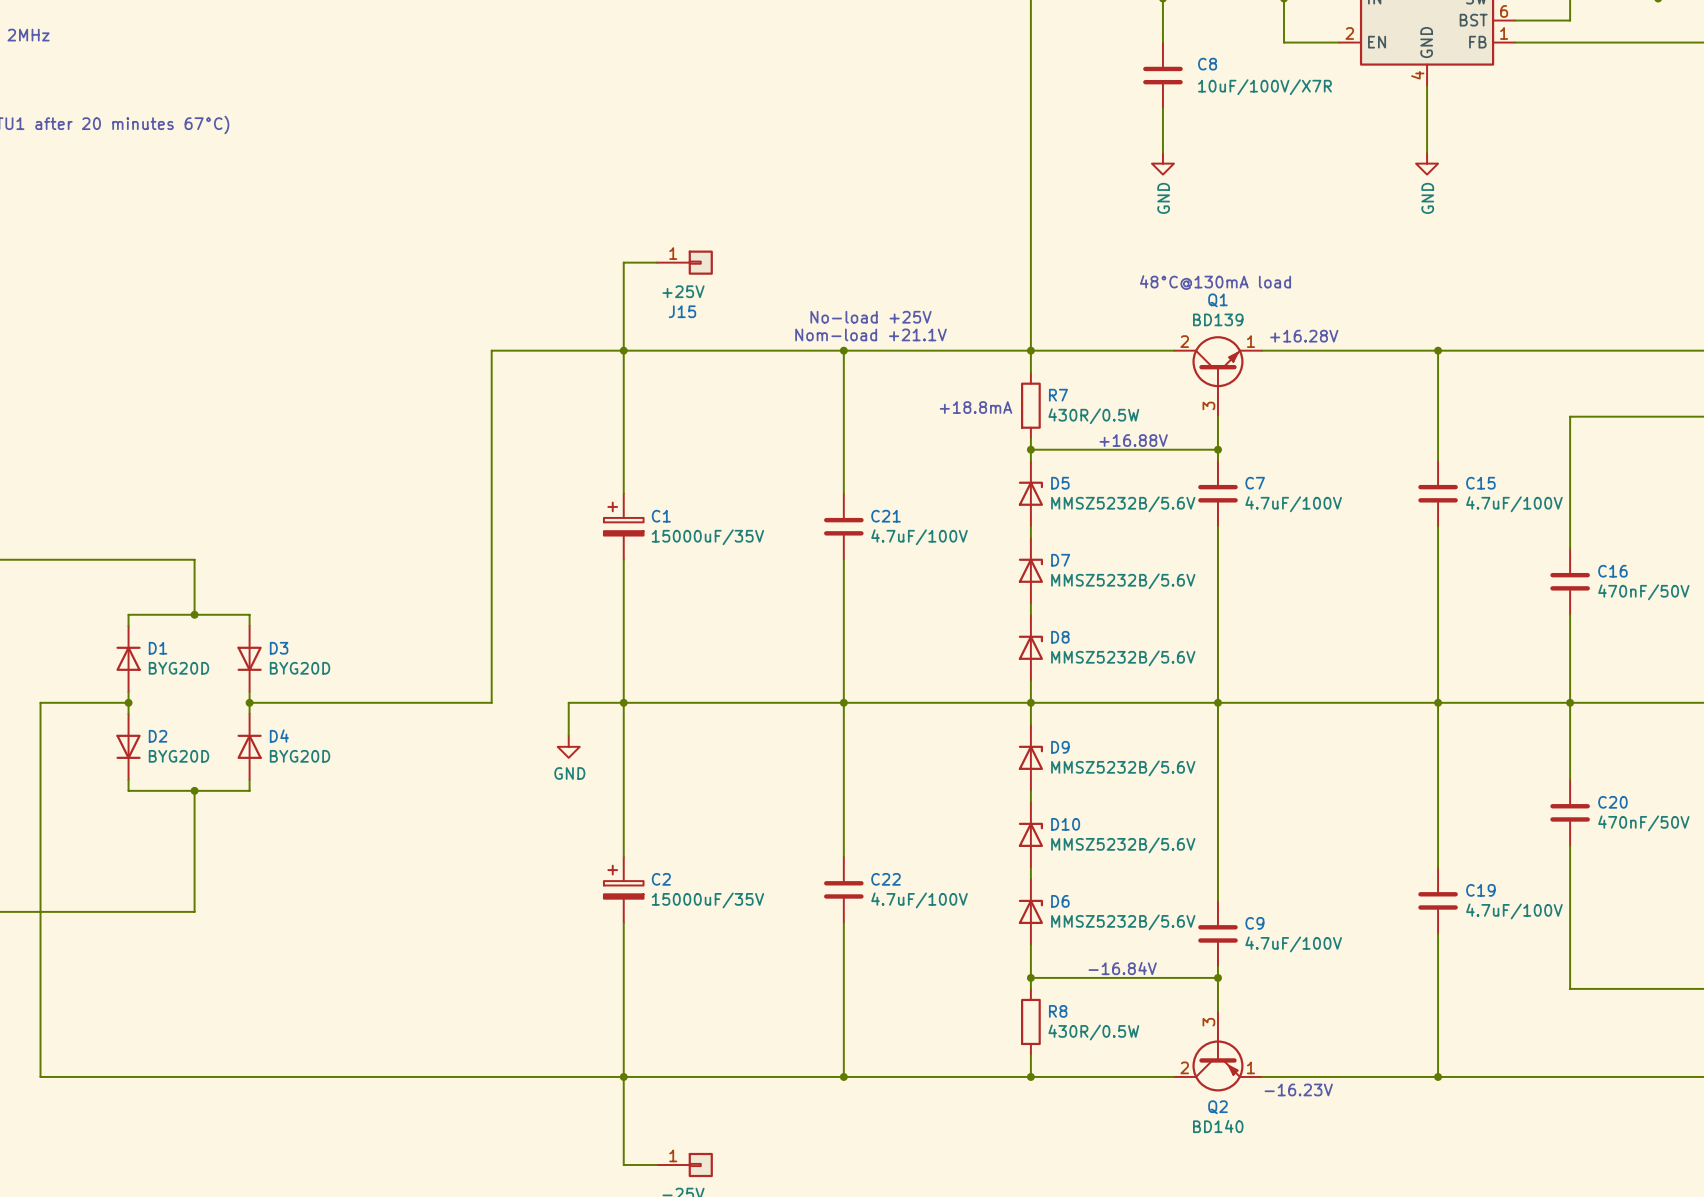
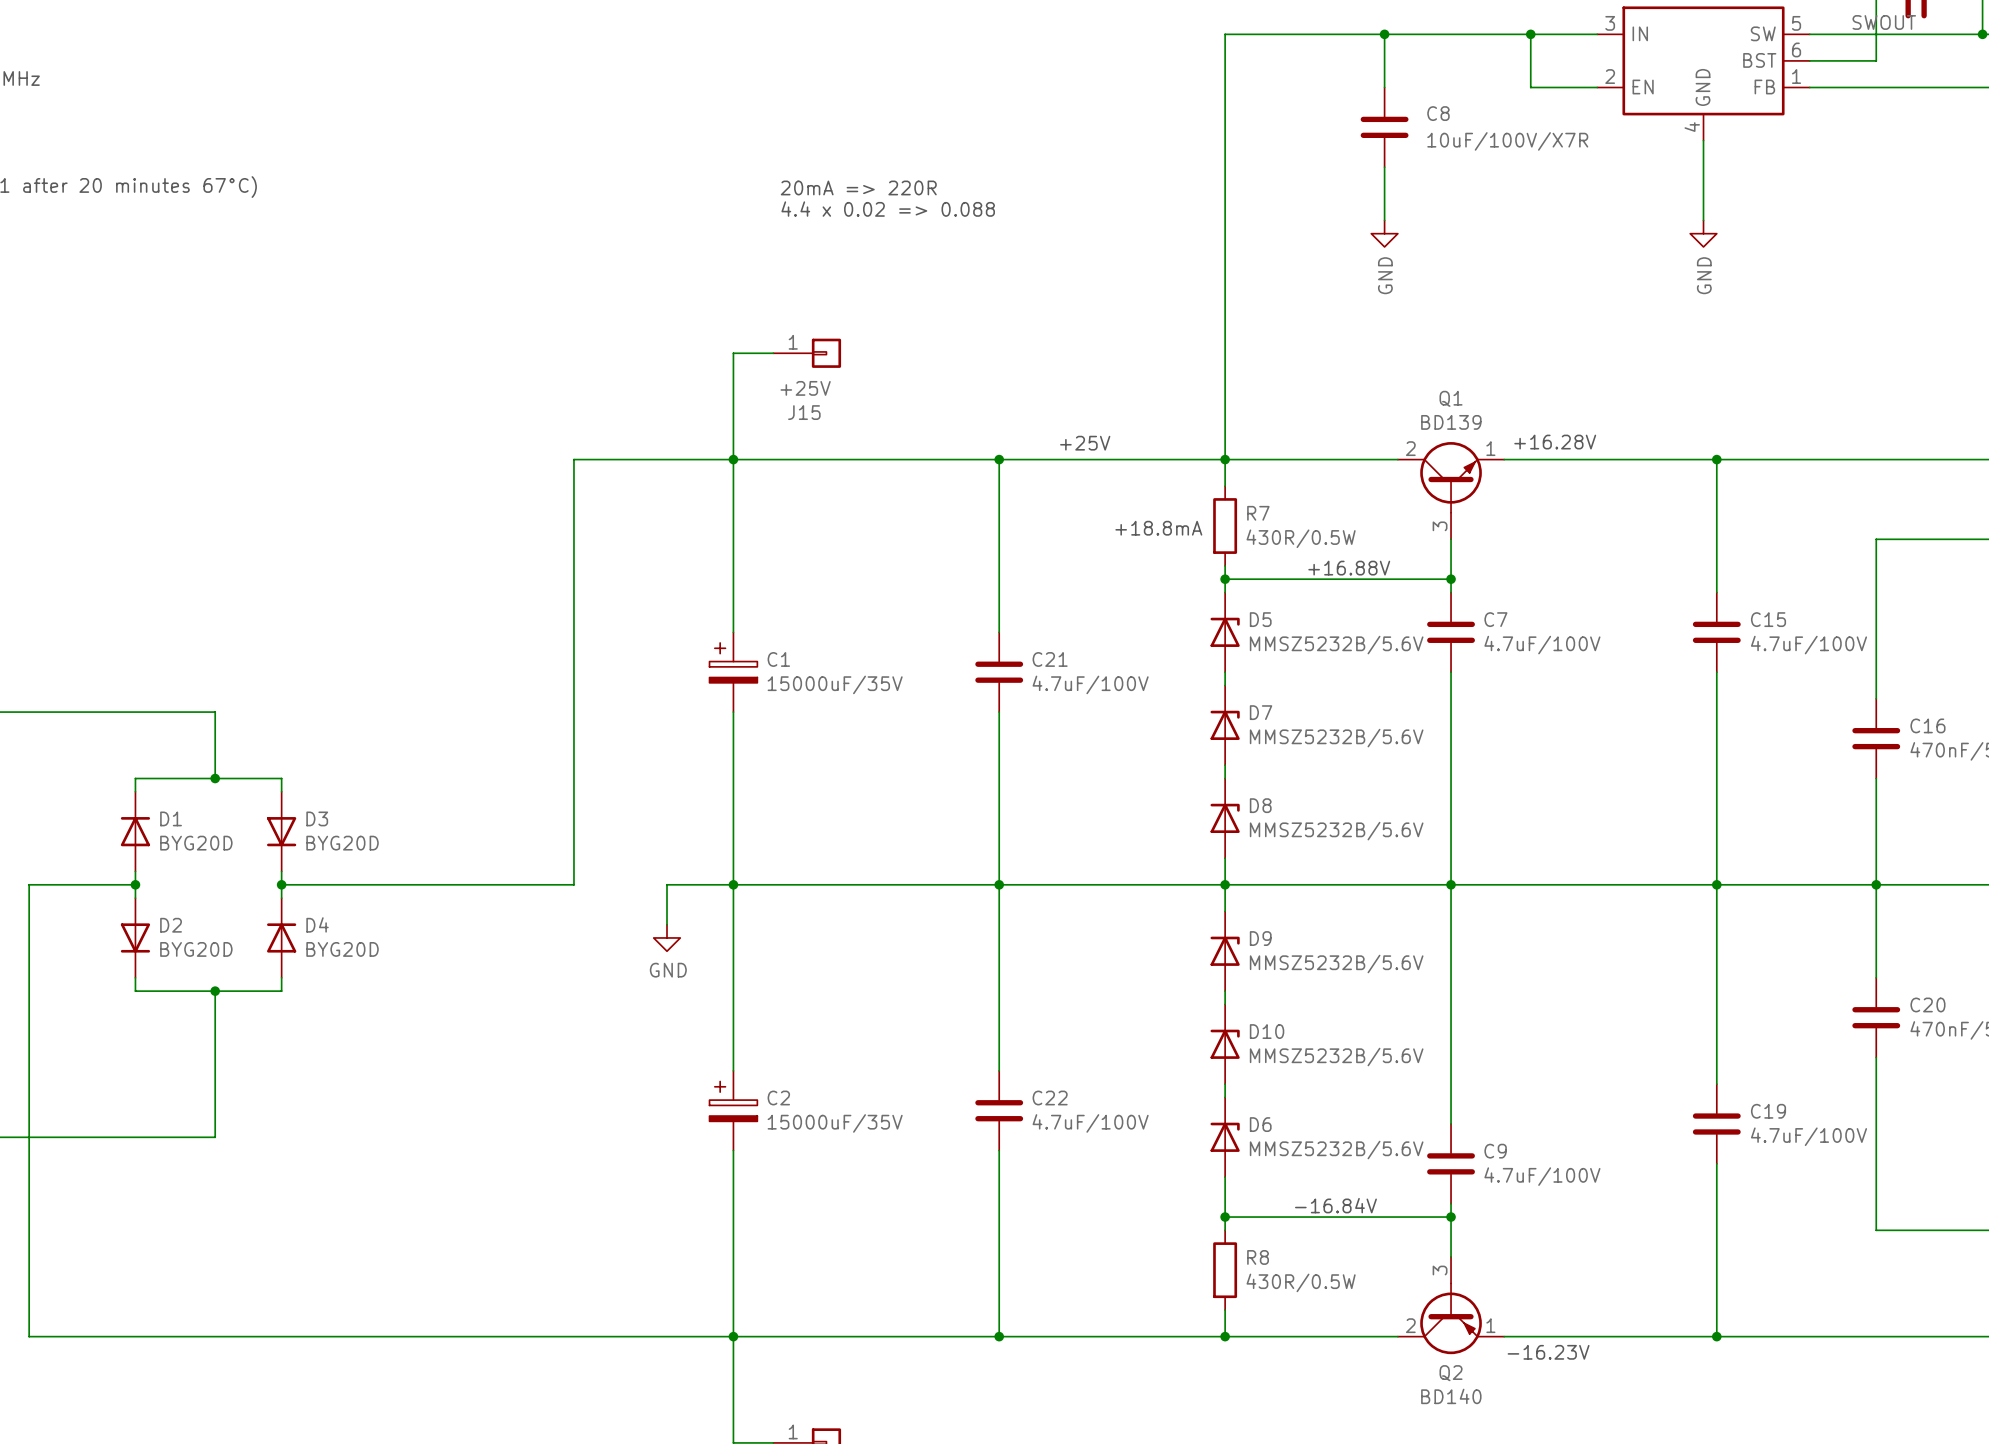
text: none -> 20mA => 220R (858, 187)
text: none -> 4.4 x 0.02 => 0.088 (888, 209)
text: 48°C@130mA load (1215, 282) -> none
text: No-load +25V (871, 317) -> none
text: Nom-load +21.1V (871, 334) -> none
text: none -> +25V (1085, 443)

